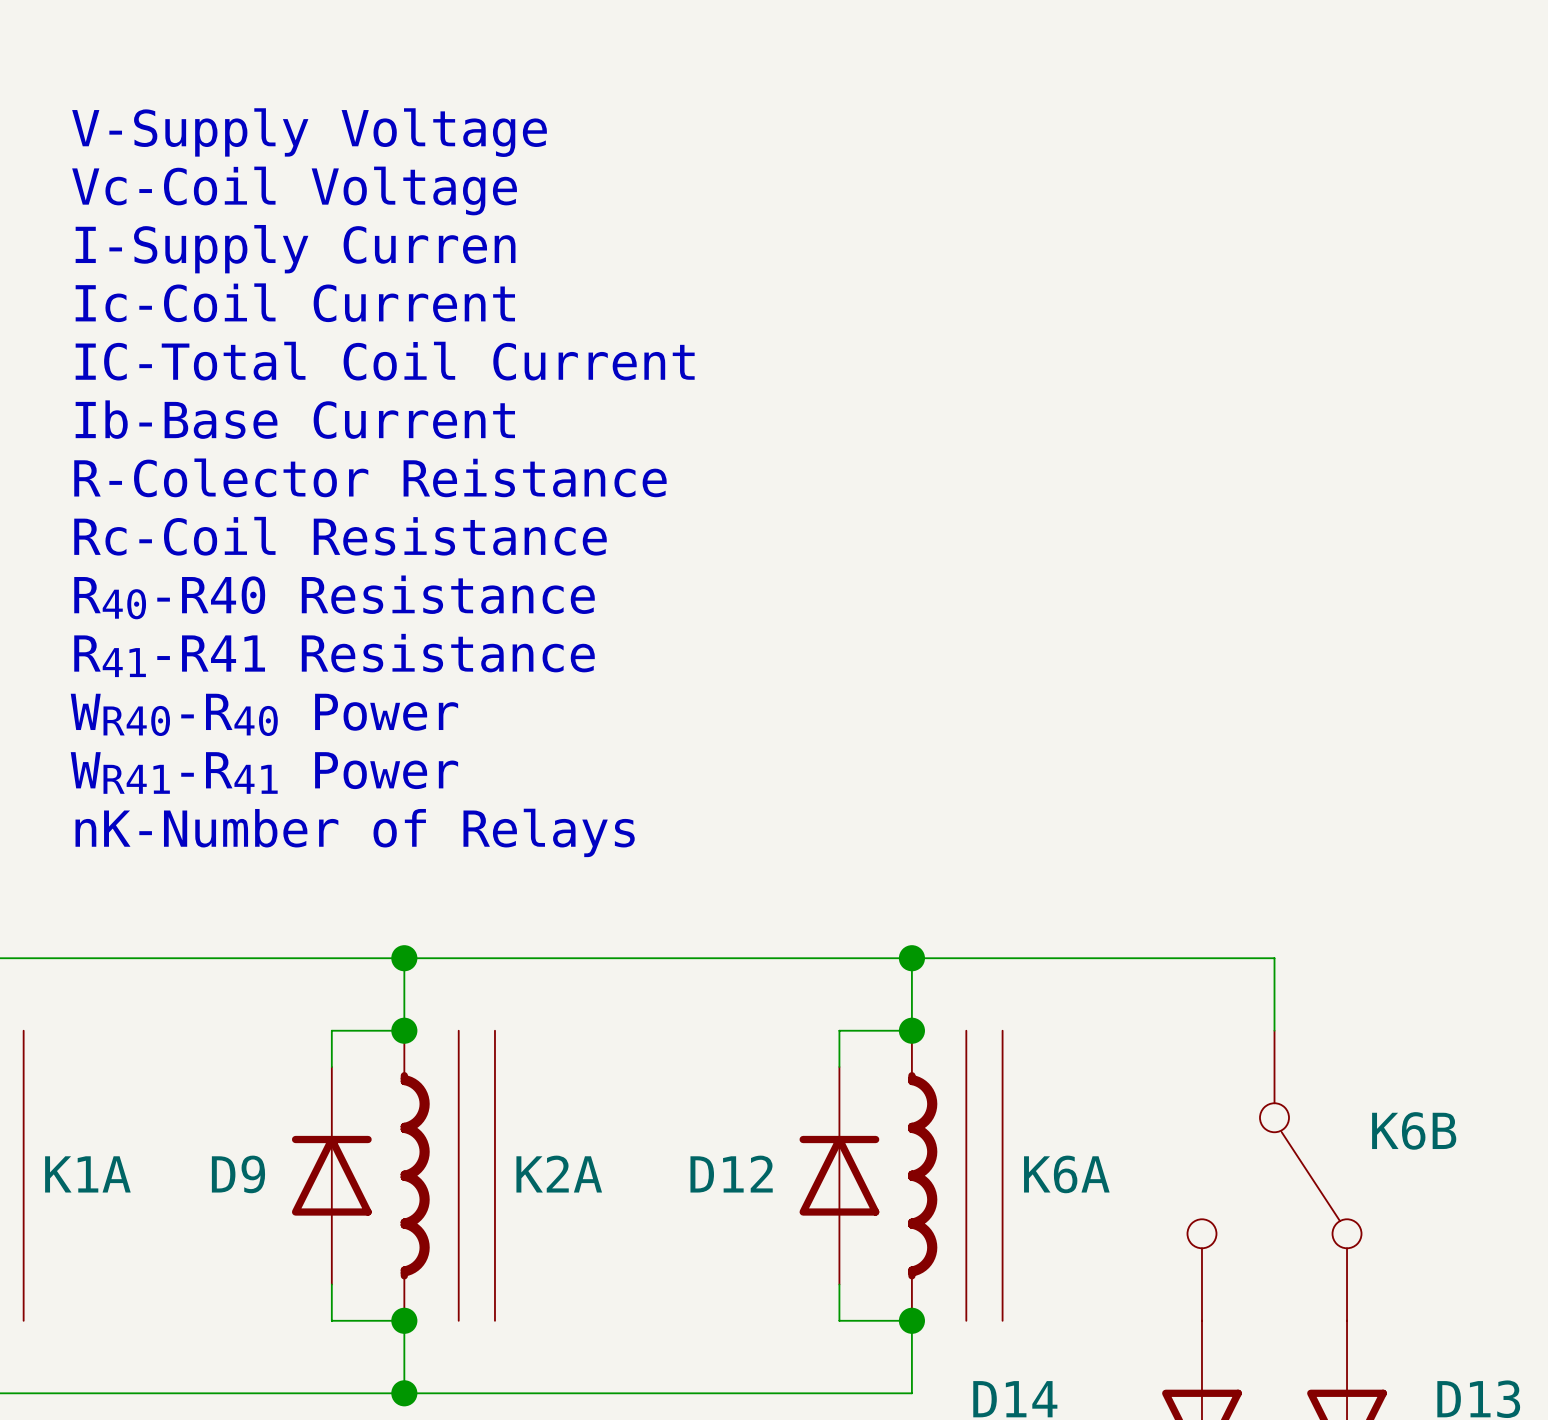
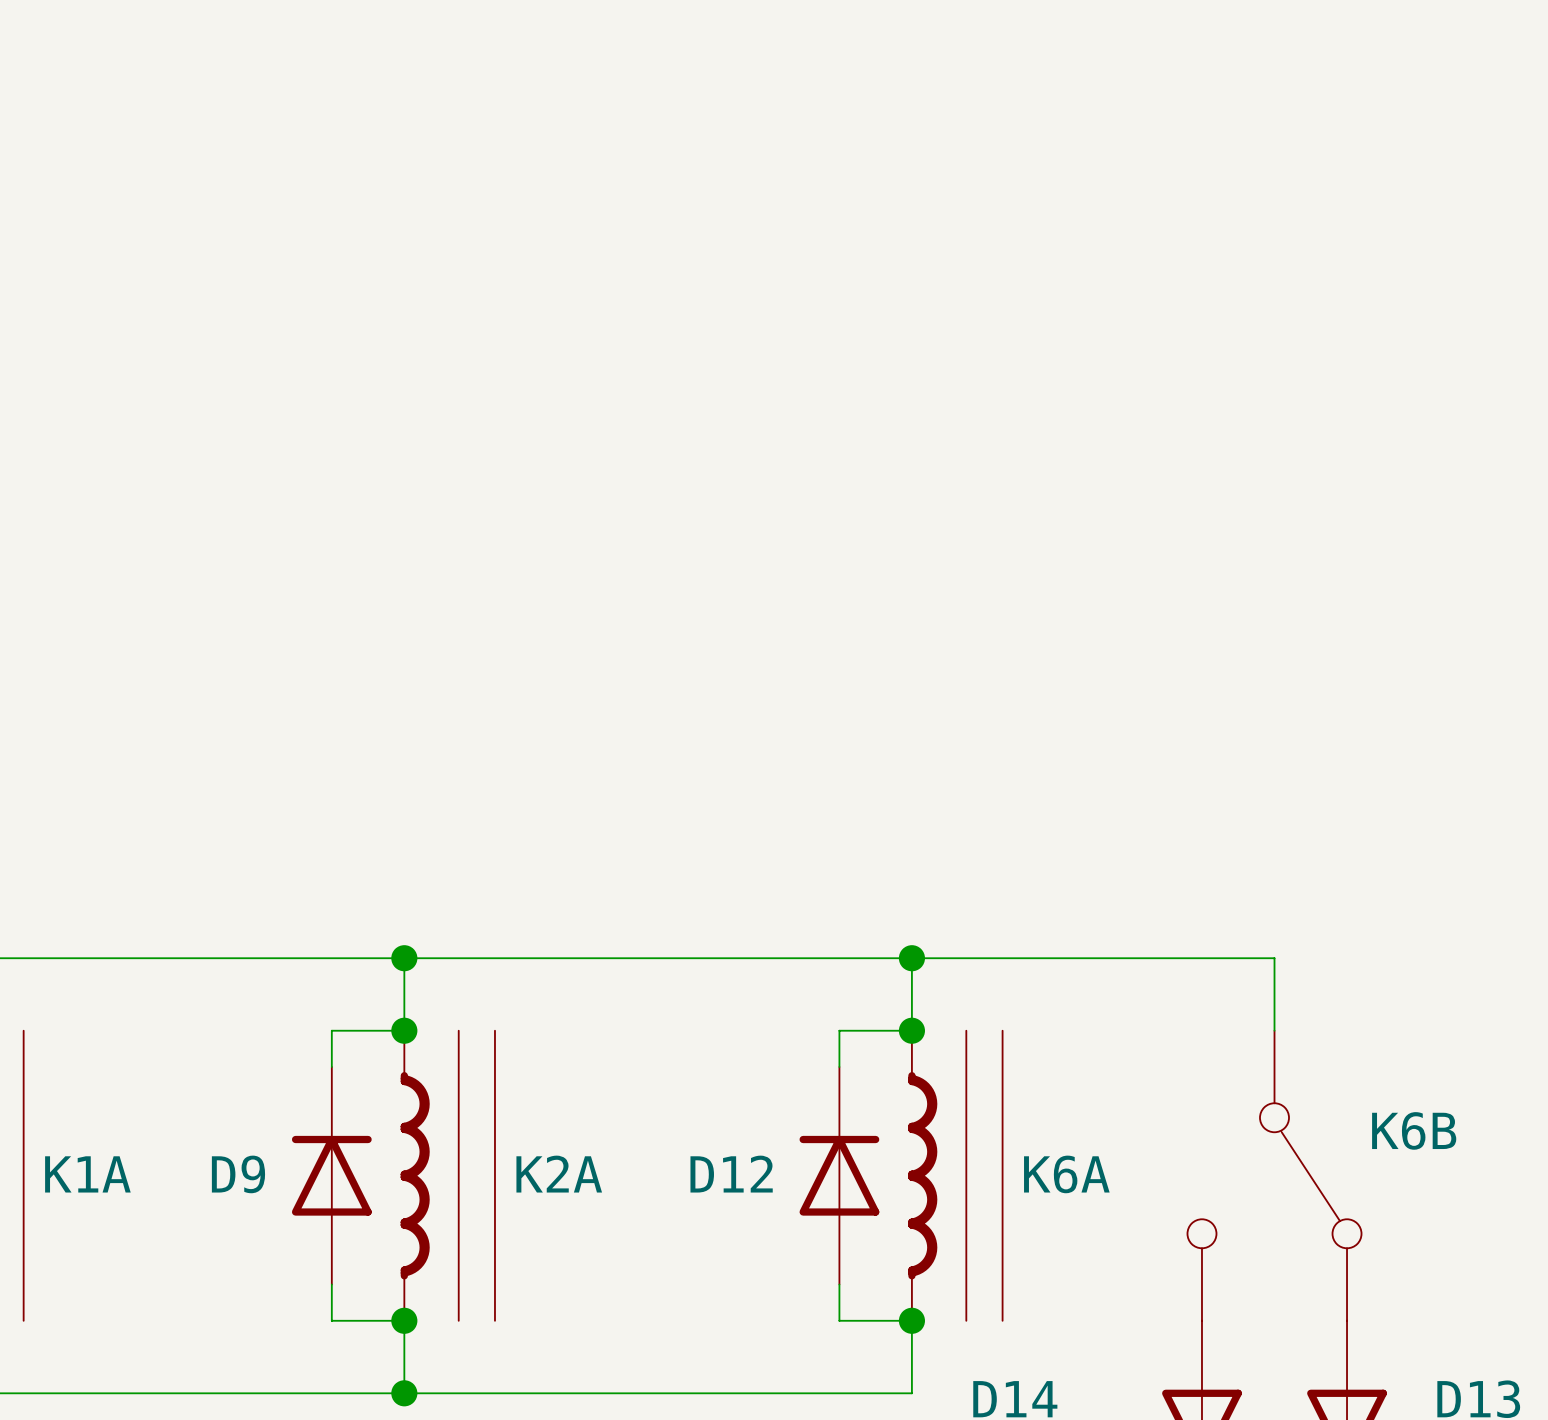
text: V-Supply Voltage (309, 132) -> none
text: Vc-Coil Voltage (294, 190) -> none
text: I-Supply Curren (295, 249) -> none
text: Ic-Coil Current (295, 302) -> none
text: IC-Total Coil Current (385, 361) -> none
text: Ib-Base Current (295, 419) -> none
text: R-Colector Reistance (370, 477) -> none
text: Rc-Coil Resistance (340, 536) -> none
text: R40-R40 Resistance (334, 597) -> none
text: R41-R41 Resistance (334, 655) -> none
text: WR40-R40 Power (264, 714) -> none
text: WR41-R41 Power (264, 772) -> none
text: nK-Number of Relays (355, 832) -> none

